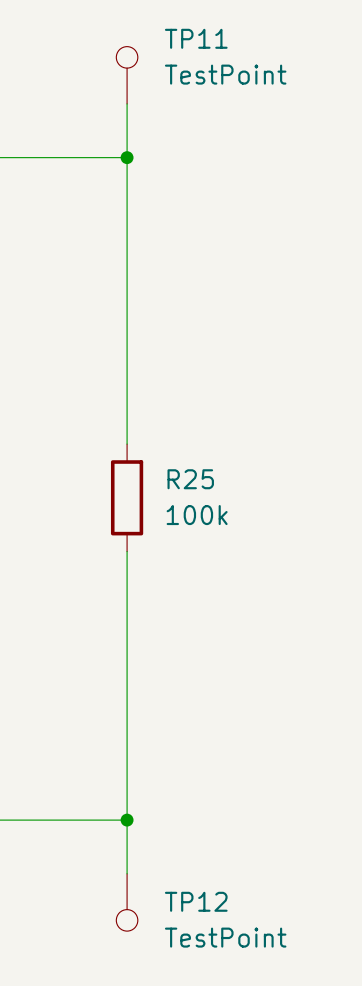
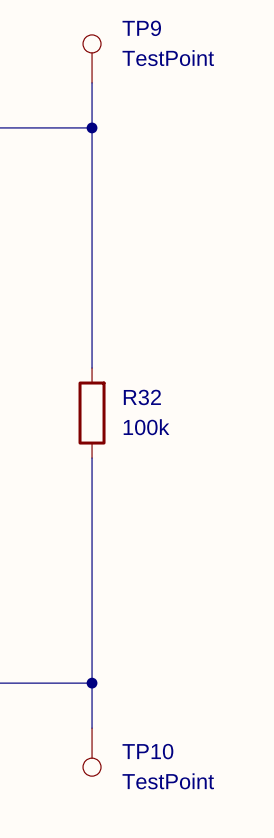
TP11 name: TP11 (196, 38) -> TP9 (141, 28)
R25 name: R25 (190, 479) -> R32 (142, 397)
TP12 name: TP12 (196, 901) -> TP10 (147, 751)

